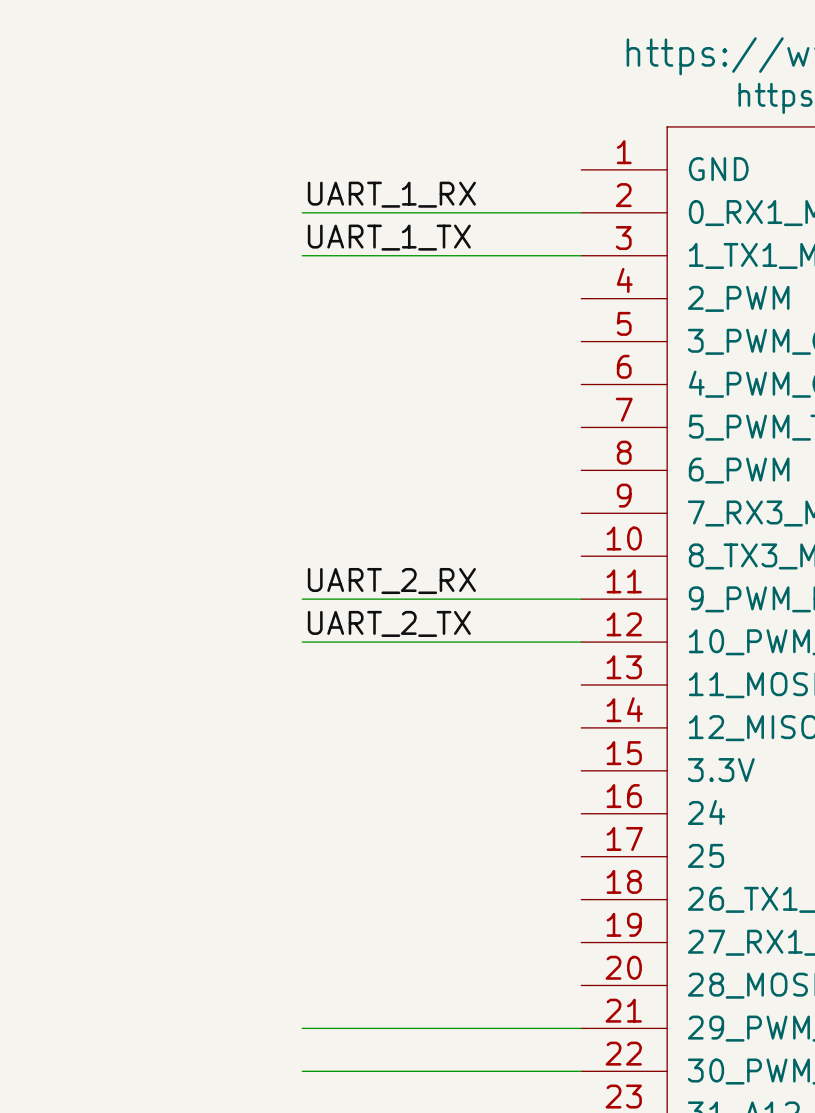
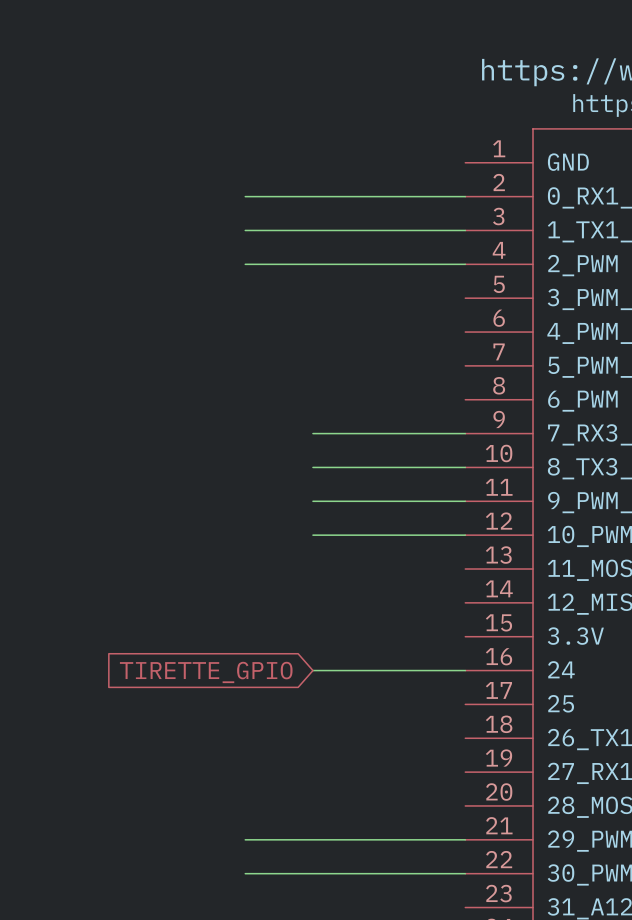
label: UART_1_RX (391, 194) -> none
label: UART_1_TX (389, 237) -> none
wire: none -> (245, 264) (465, 264)
wire: none -> (312, 433) (465, 433)
wire: none -> (312, 467) (465, 467)
label: UART_2_RX (391, 581) -> none
wire: (302, 599) (388, 599) -> none
label: UART_2_TX (389, 623) -> none
wire: (302, 642) (388, 642) -> none
wire: none -> (312, 670) (465, 670)
global label: none -> TIRETTE_GPIO (206, 672)

